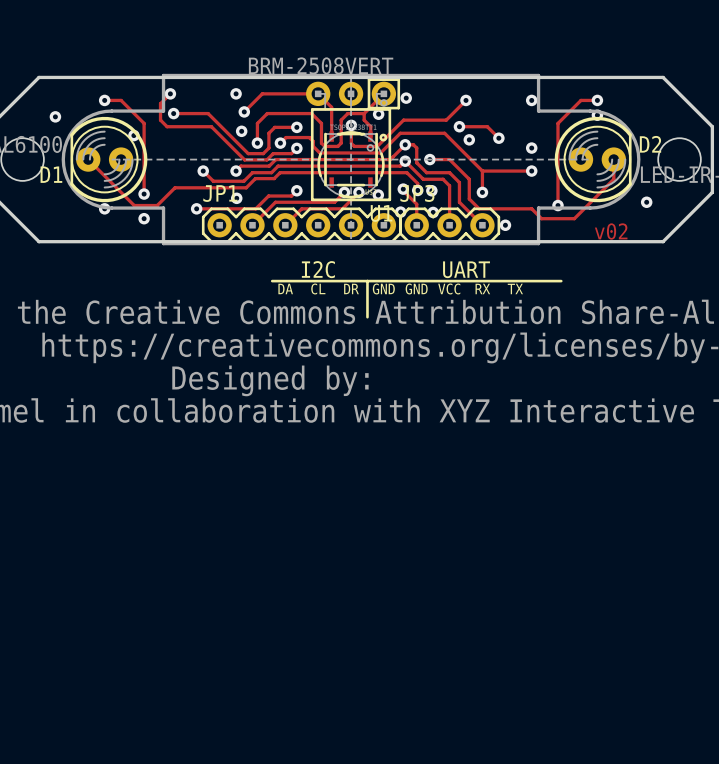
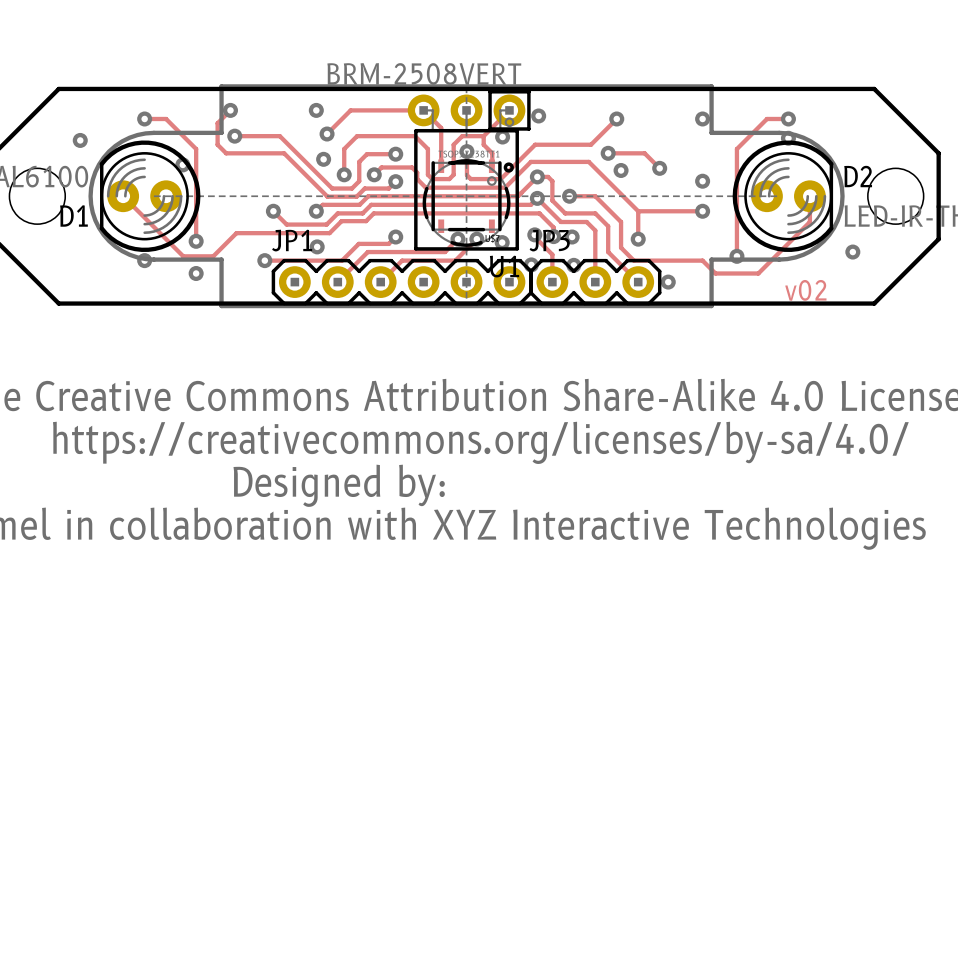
text: I2C (318, 269) -> none
text: UART (466, 269) -> none
line: (272, 281) (561, 281) -> none
line: (367, 281) (367, 317) -> none
text: DA (285, 288) -> none
text: CL (318, 288) -> none
text: DR (351, 288) -> none
text: GND (383, 288) -> none
text: GND (416, 288) -> none
text: VCC (449, 288) -> none
text: RX (482, 288) -> none
text: TX (515, 288) -> none

